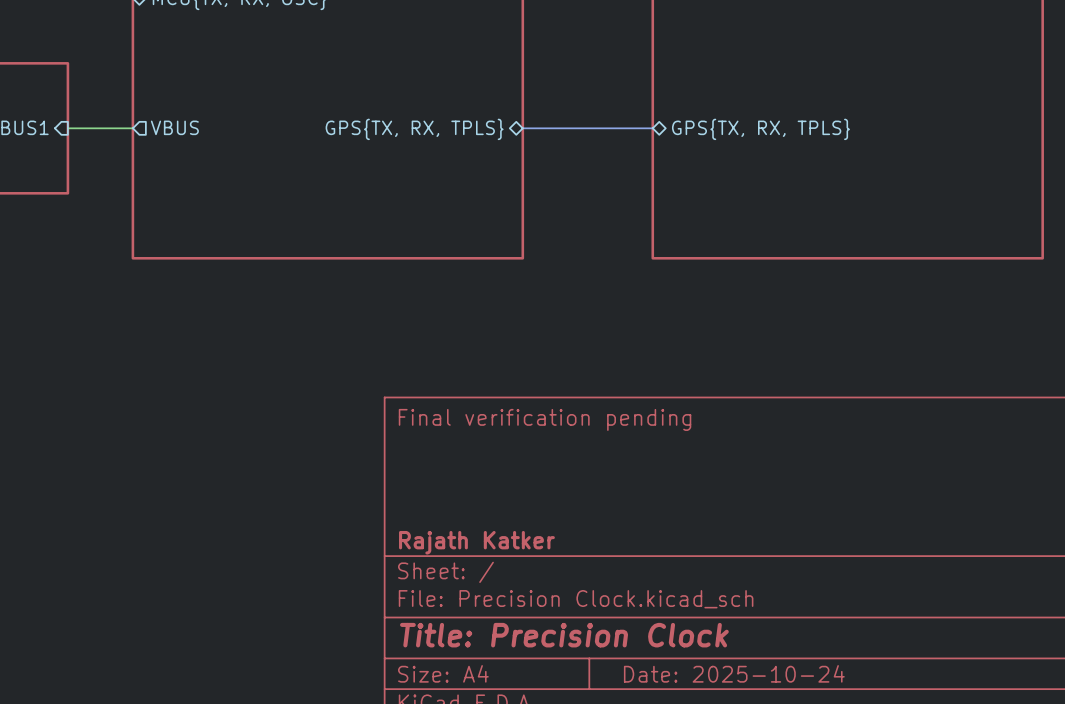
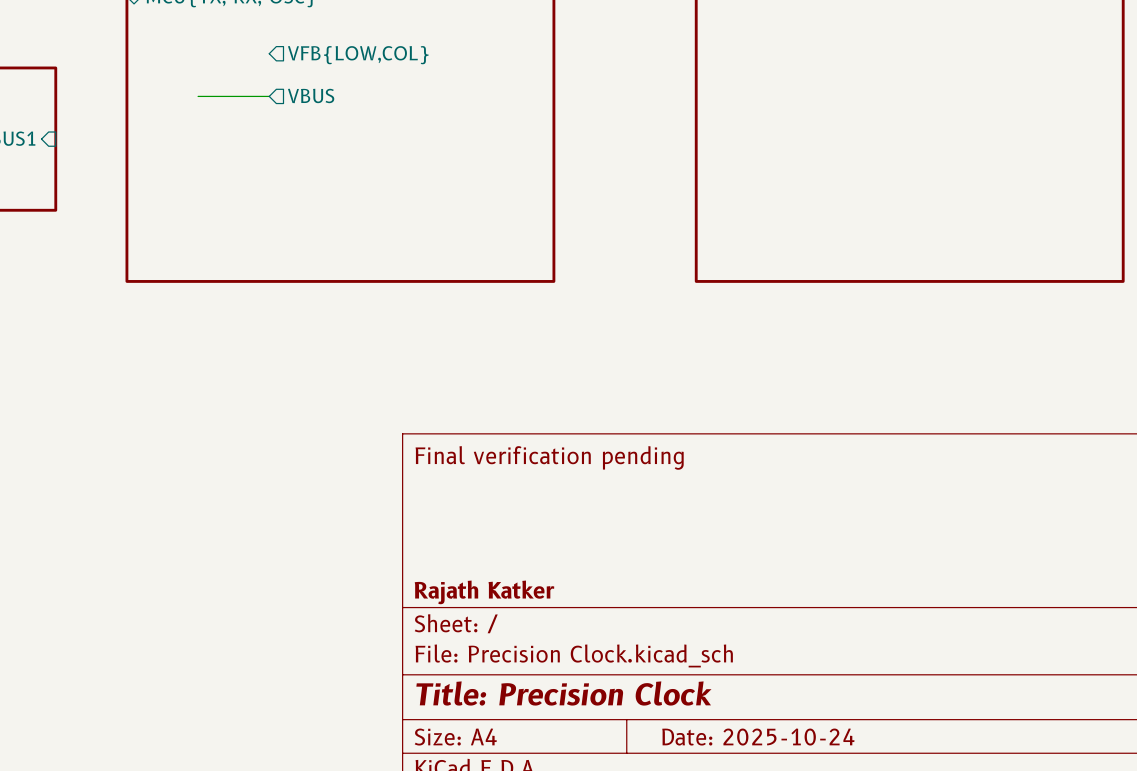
sheet pin: none -> VFB{LOW,COL} (358, 55)
sheet pin position: VBUS (174, 127) -> VBUS (311, 95)
wire: (67, 128) (132, 128) -> (198, 96) (269, 96)
bus: (522, 128) (652, 128) -> none
sheet pin: GPS{TX, RX, TPLS} (414, 129) -> none
sheet pin: GPS{TX, RX, TPLS} (760, 129) -> none

